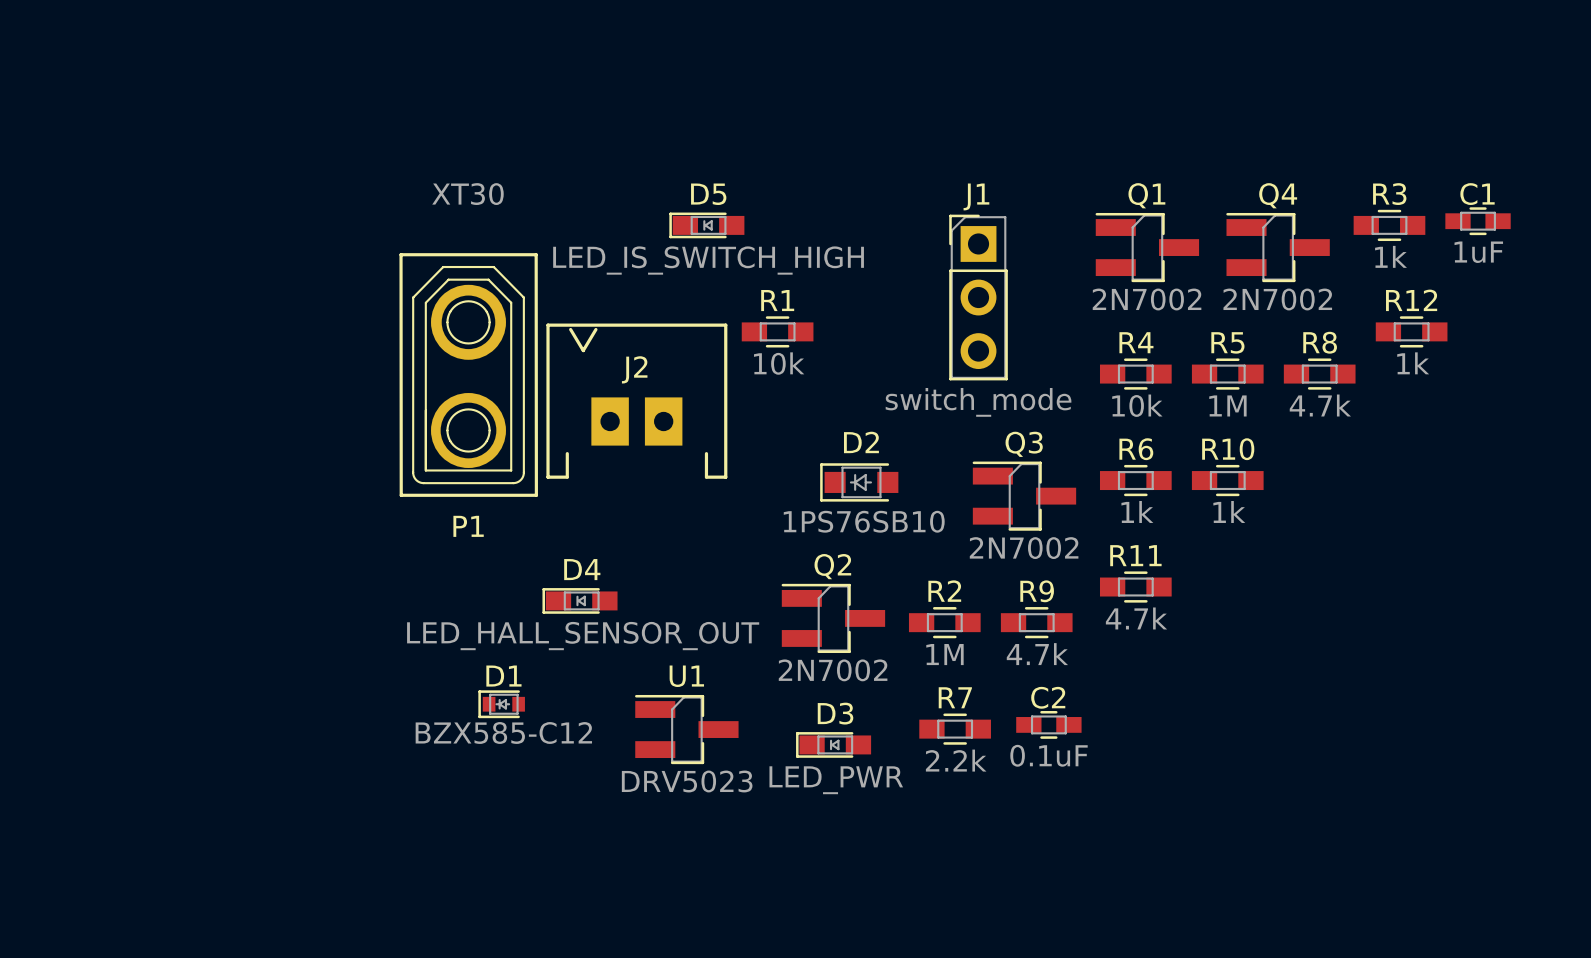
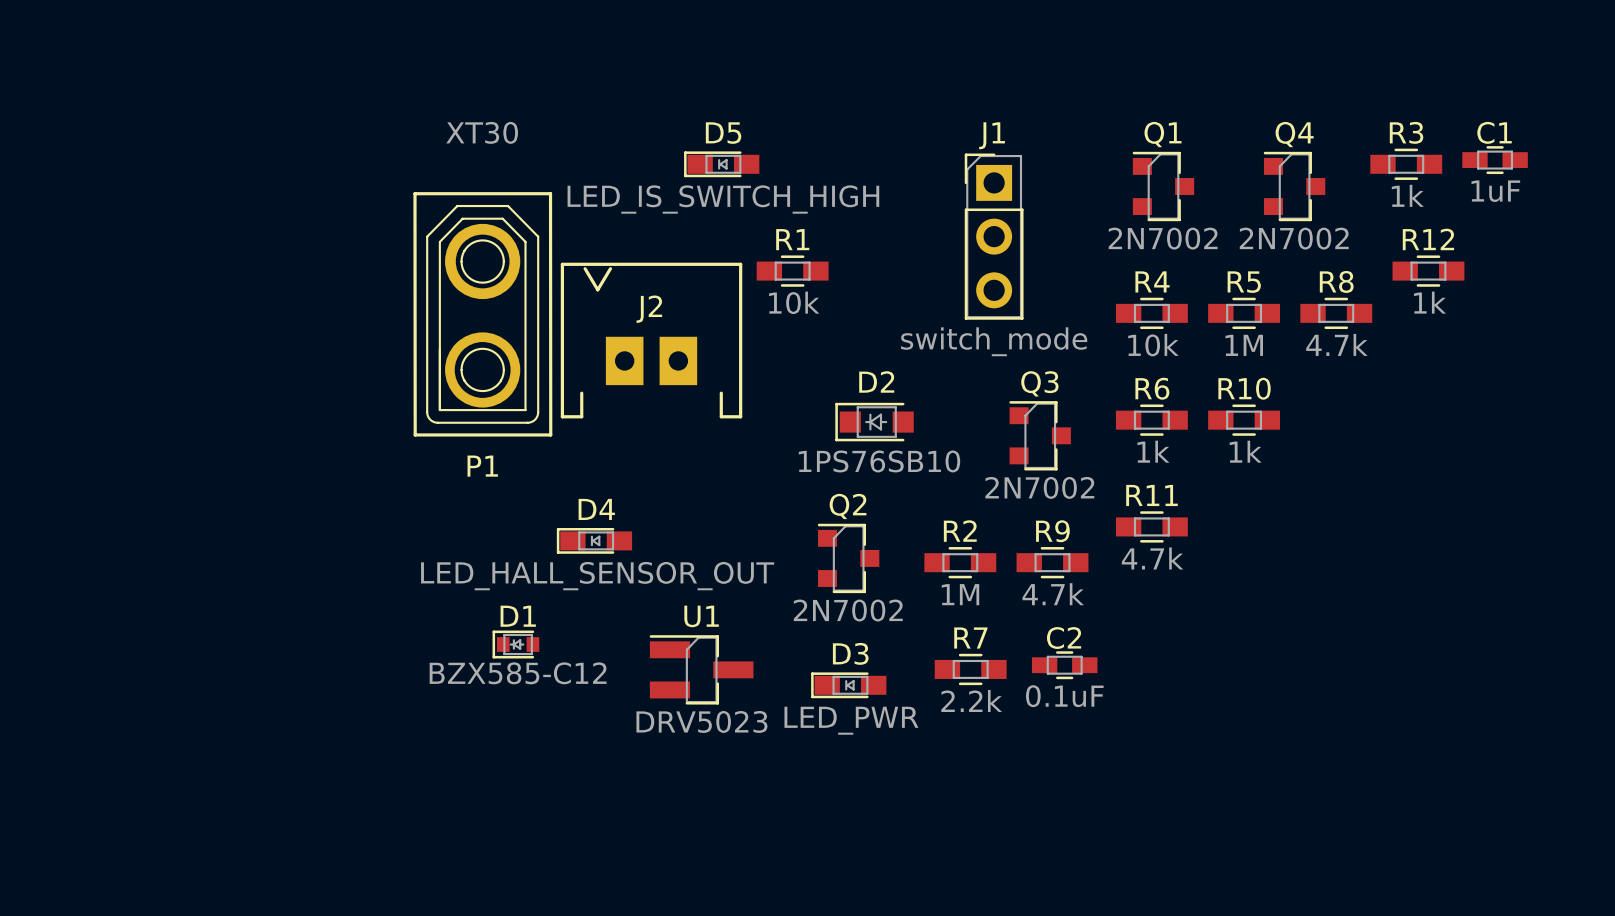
Q1 footprint: [1095, 212, 1200, 283] -> [1132, 151, 1195, 222]
Q4 footprint: [1226, 212, 1330, 283] -> [1263, 151, 1326, 222]
Q3 footprint: [972, 461, 1077, 531] -> [1009, 401, 1071, 471]
Q2 footprint: [781, 583, 886, 654] -> [817, 523, 880, 594]

